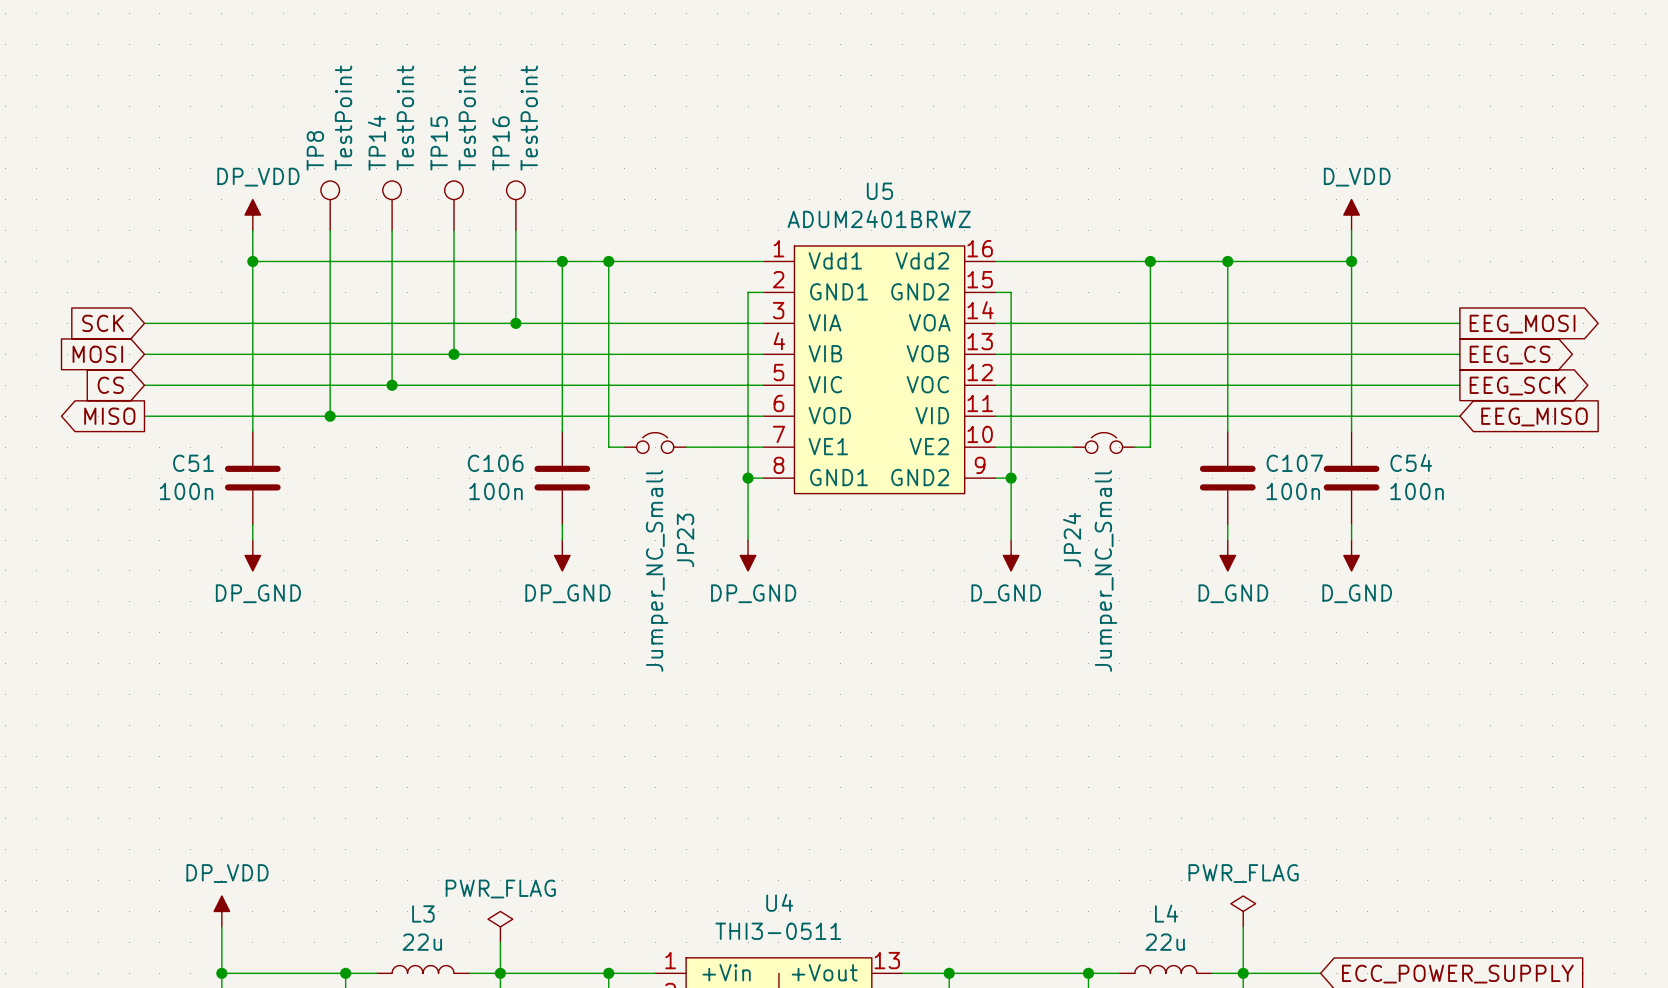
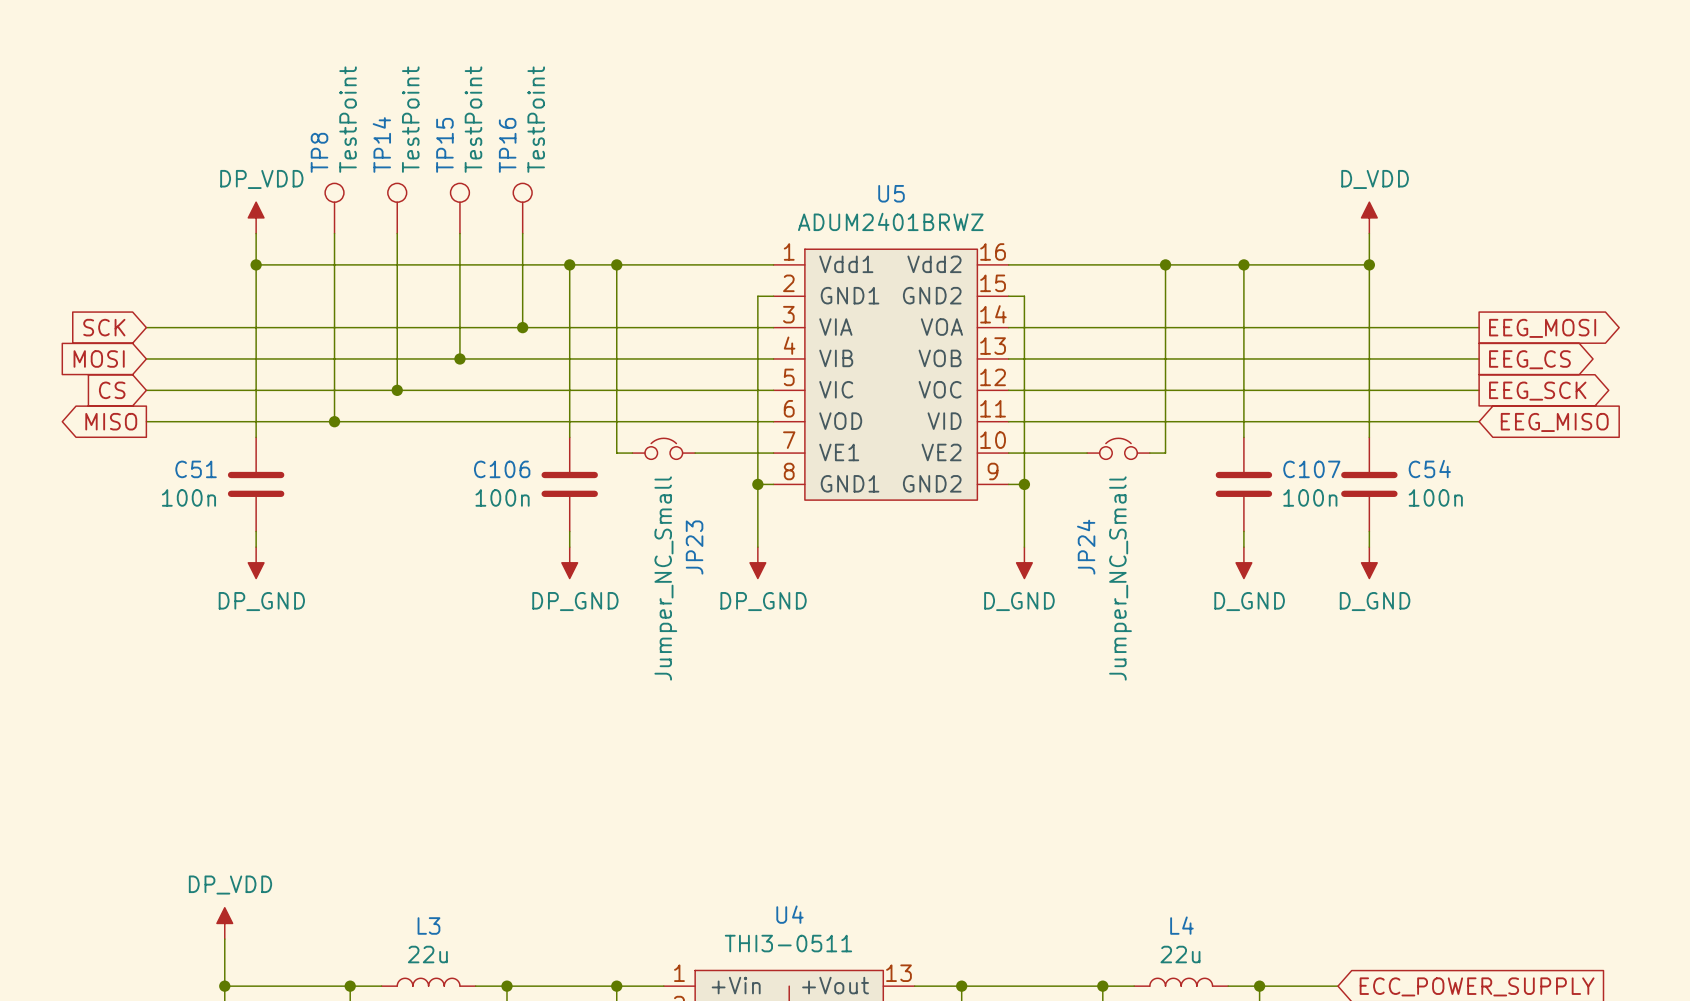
power symbol: PWR_FLAG (1243, 911) -> none
power symbol: PWR_FLAG (500, 926) -> none
wire: (1243, 926) (1243, 973) -> none
wire: (500, 942) (500, 973) -> none

